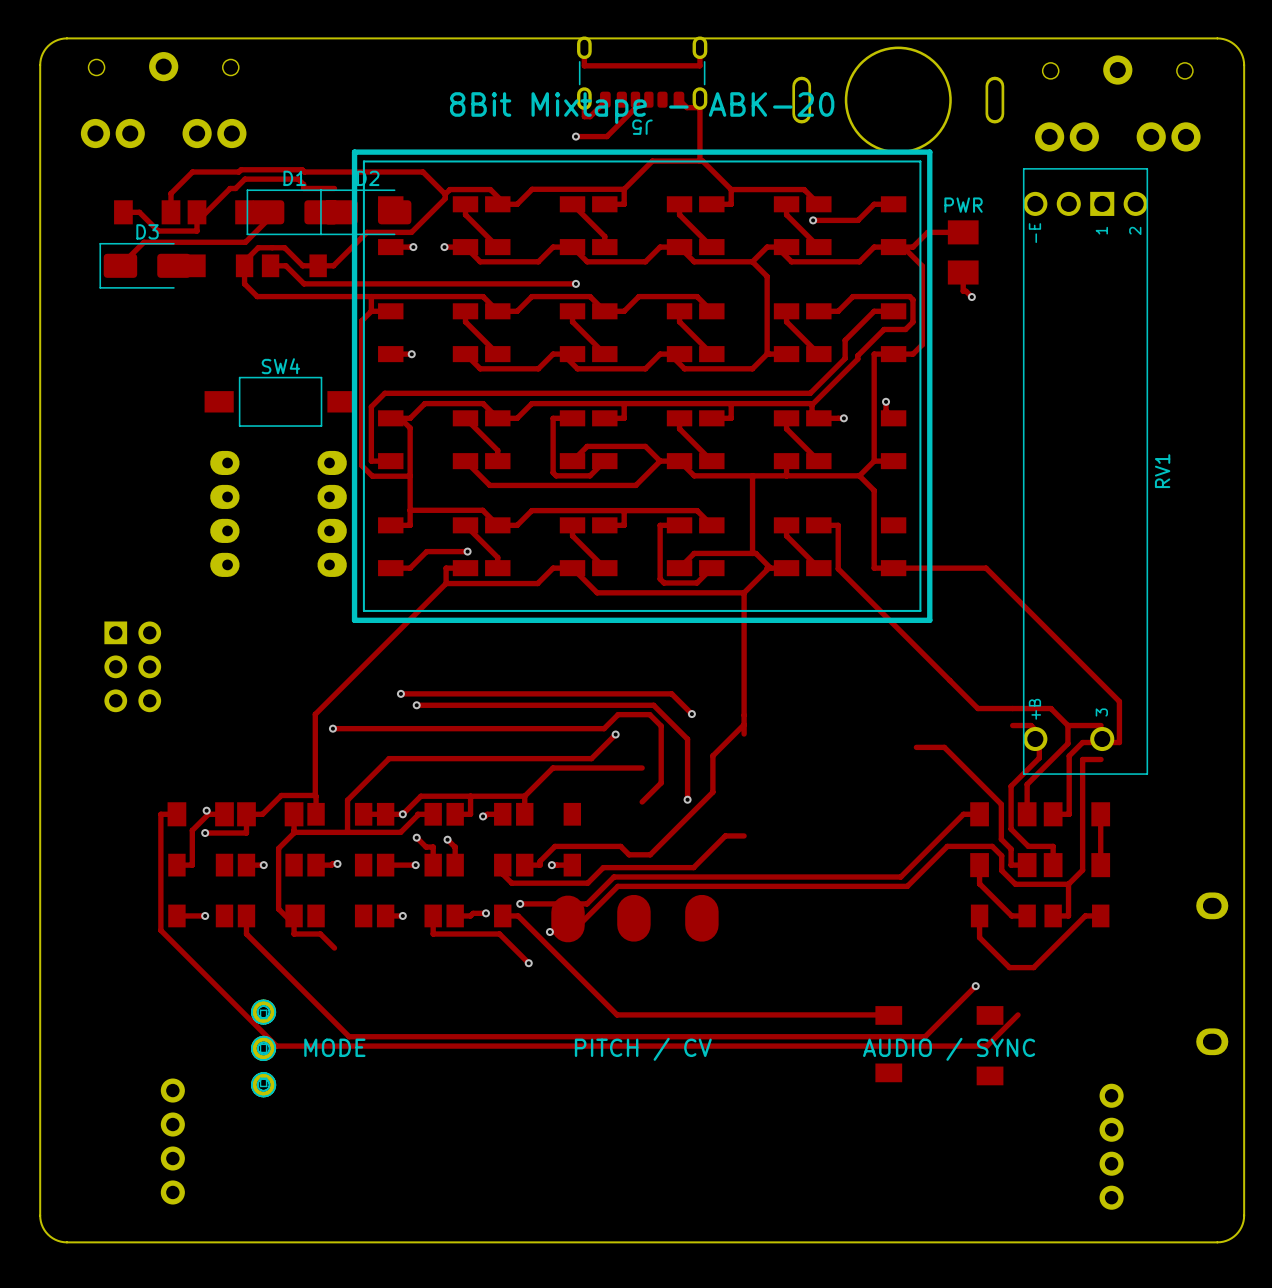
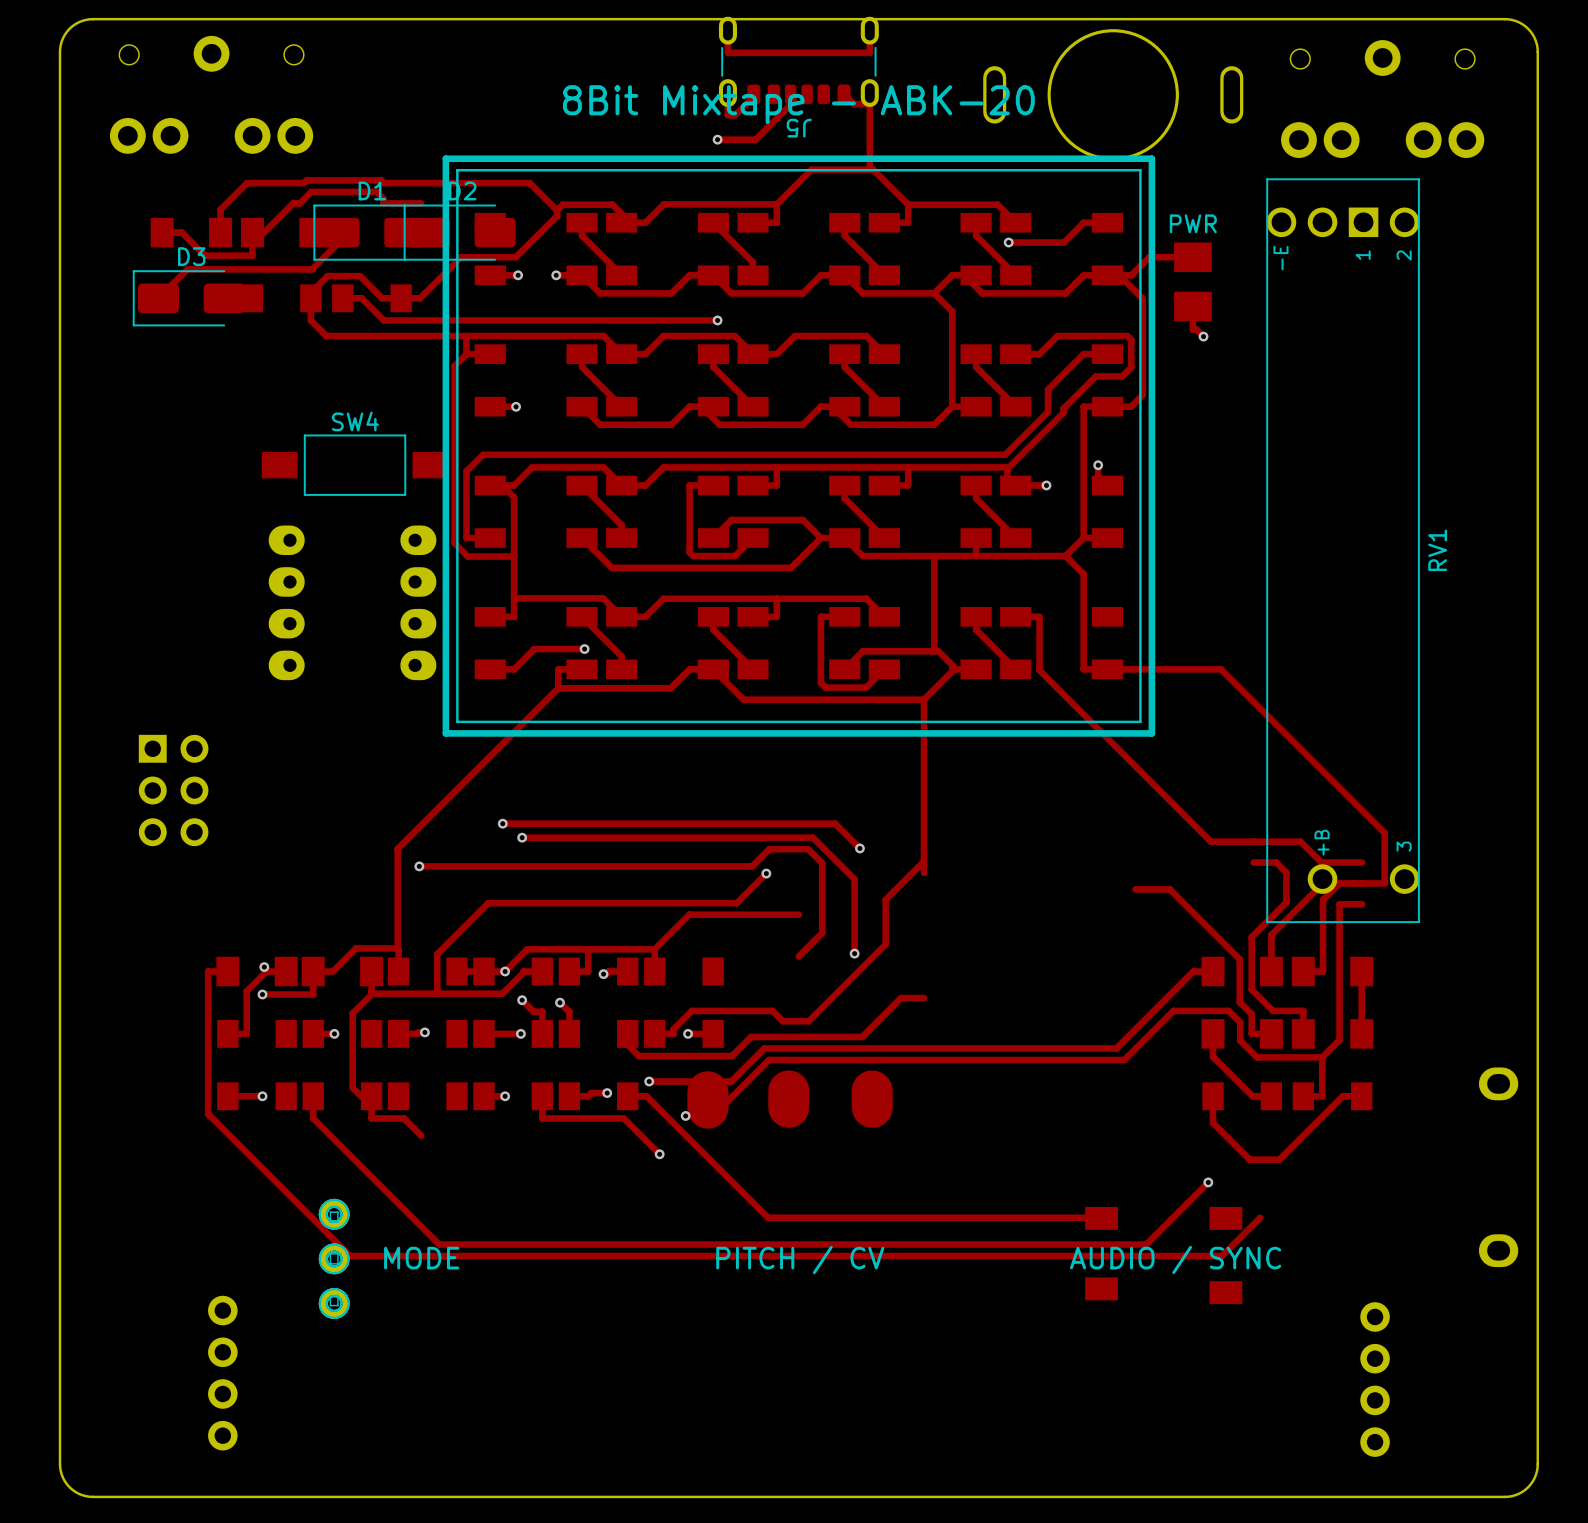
RV1 footprint: [1022, 168, 1149, 775] -> [1266, 178, 1420, 924]

